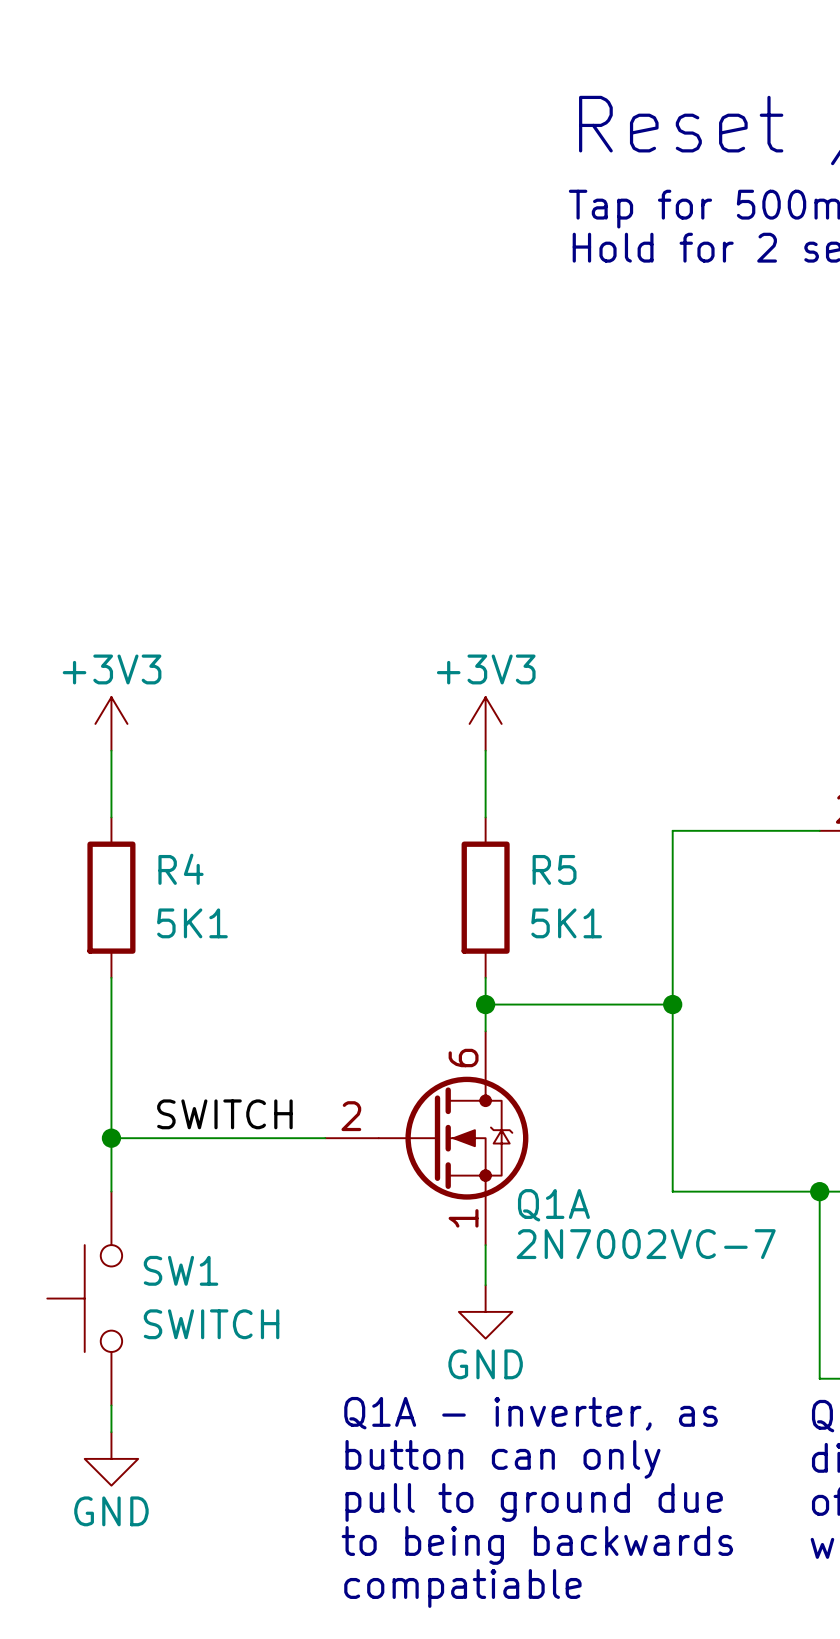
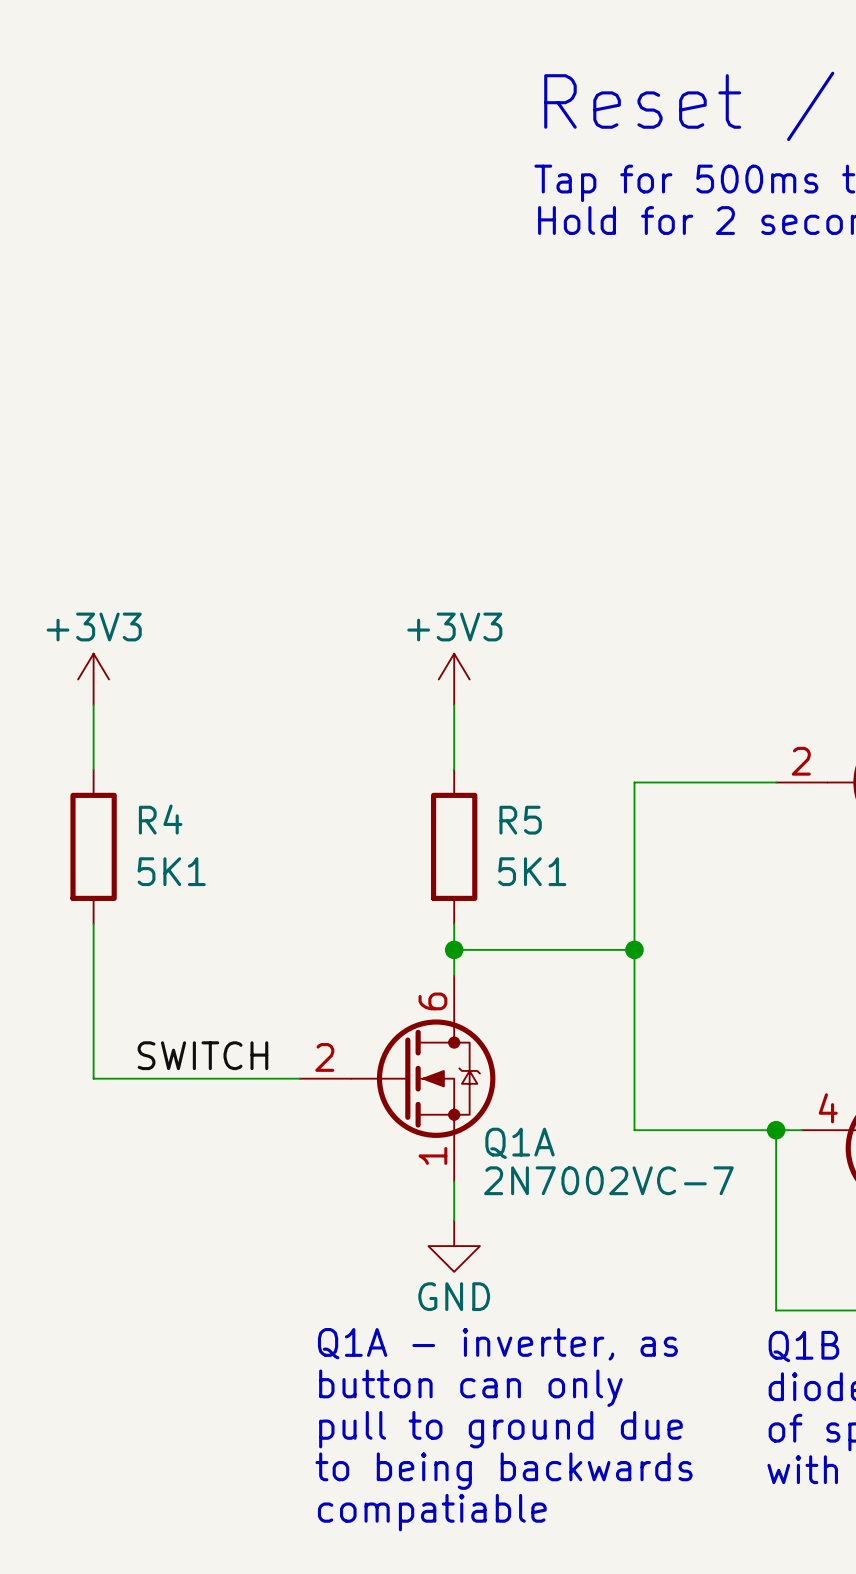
wire: (111, 1138) (111, 1191) -> none
junction: (111, 1138) -> none
SW1: SWITCH (84, 1298) -> none
wire: (111, 1405) (111, 1432) -> none
power symbol: GND (111, 1458) -> none

